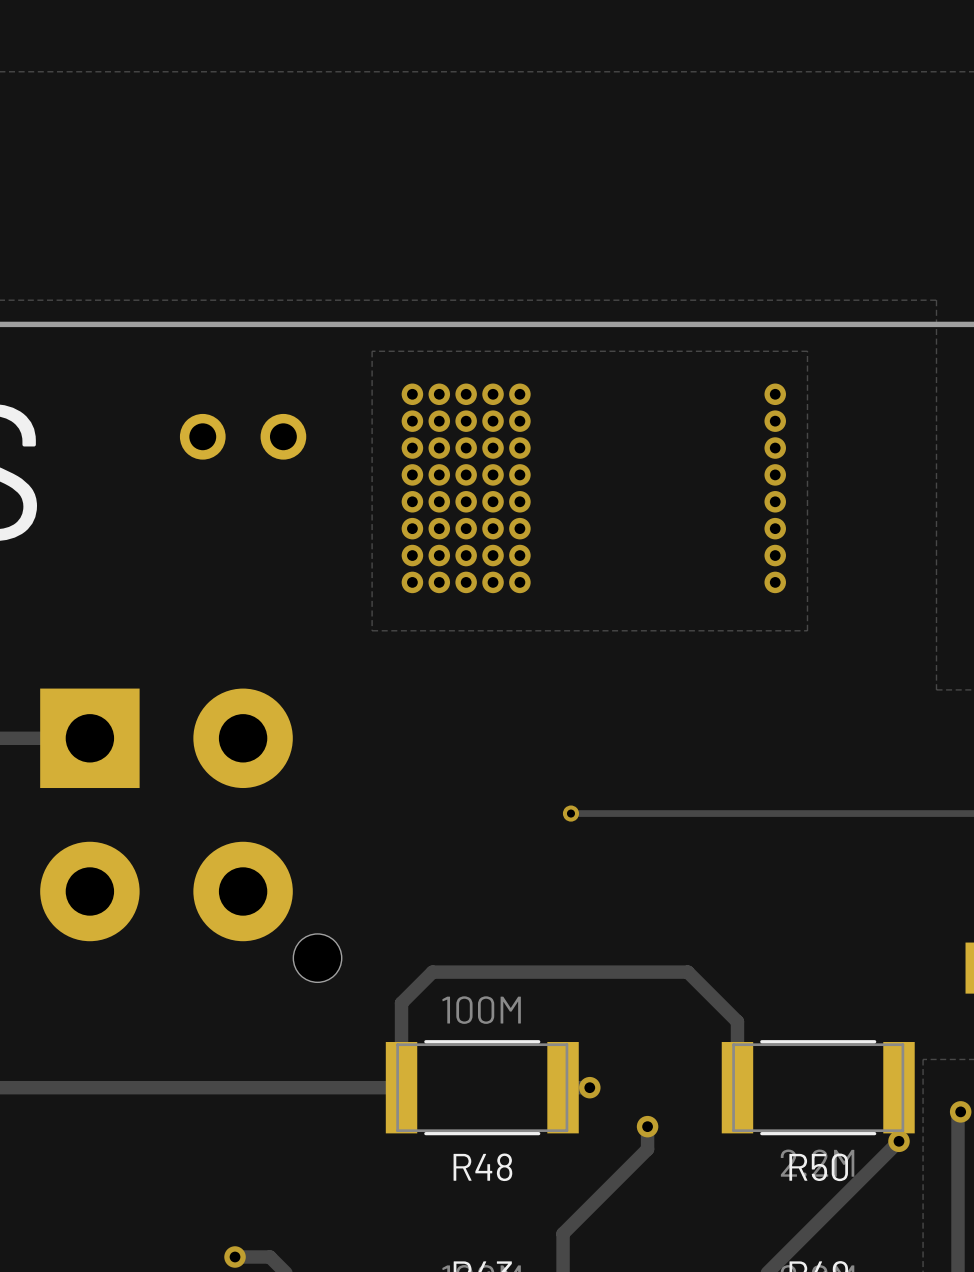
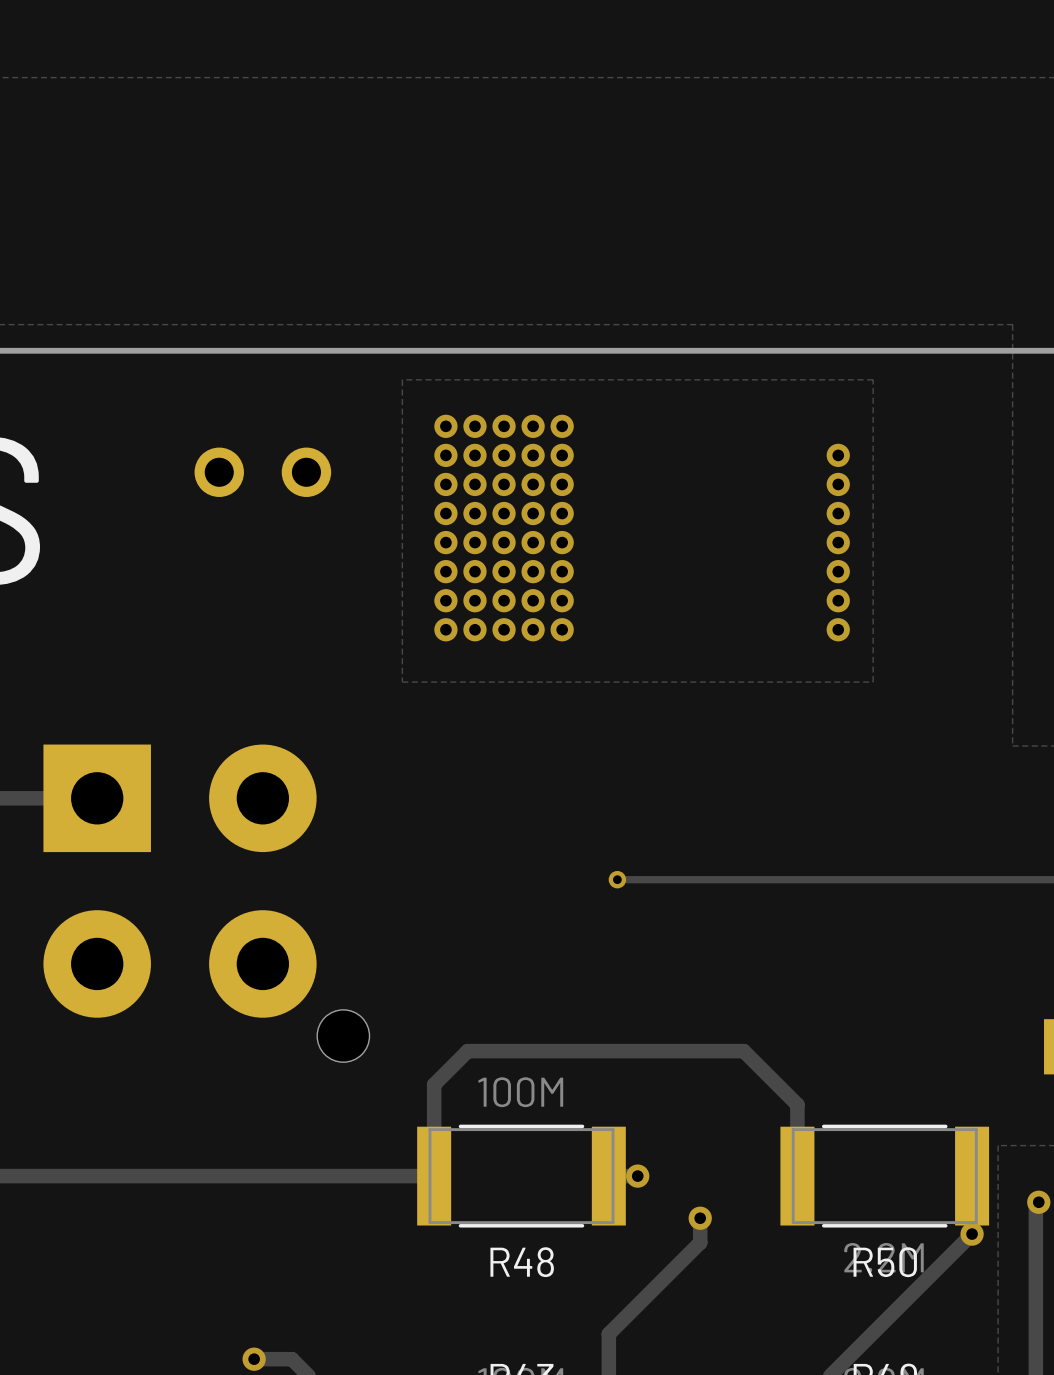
via: (775, 394) -> none

